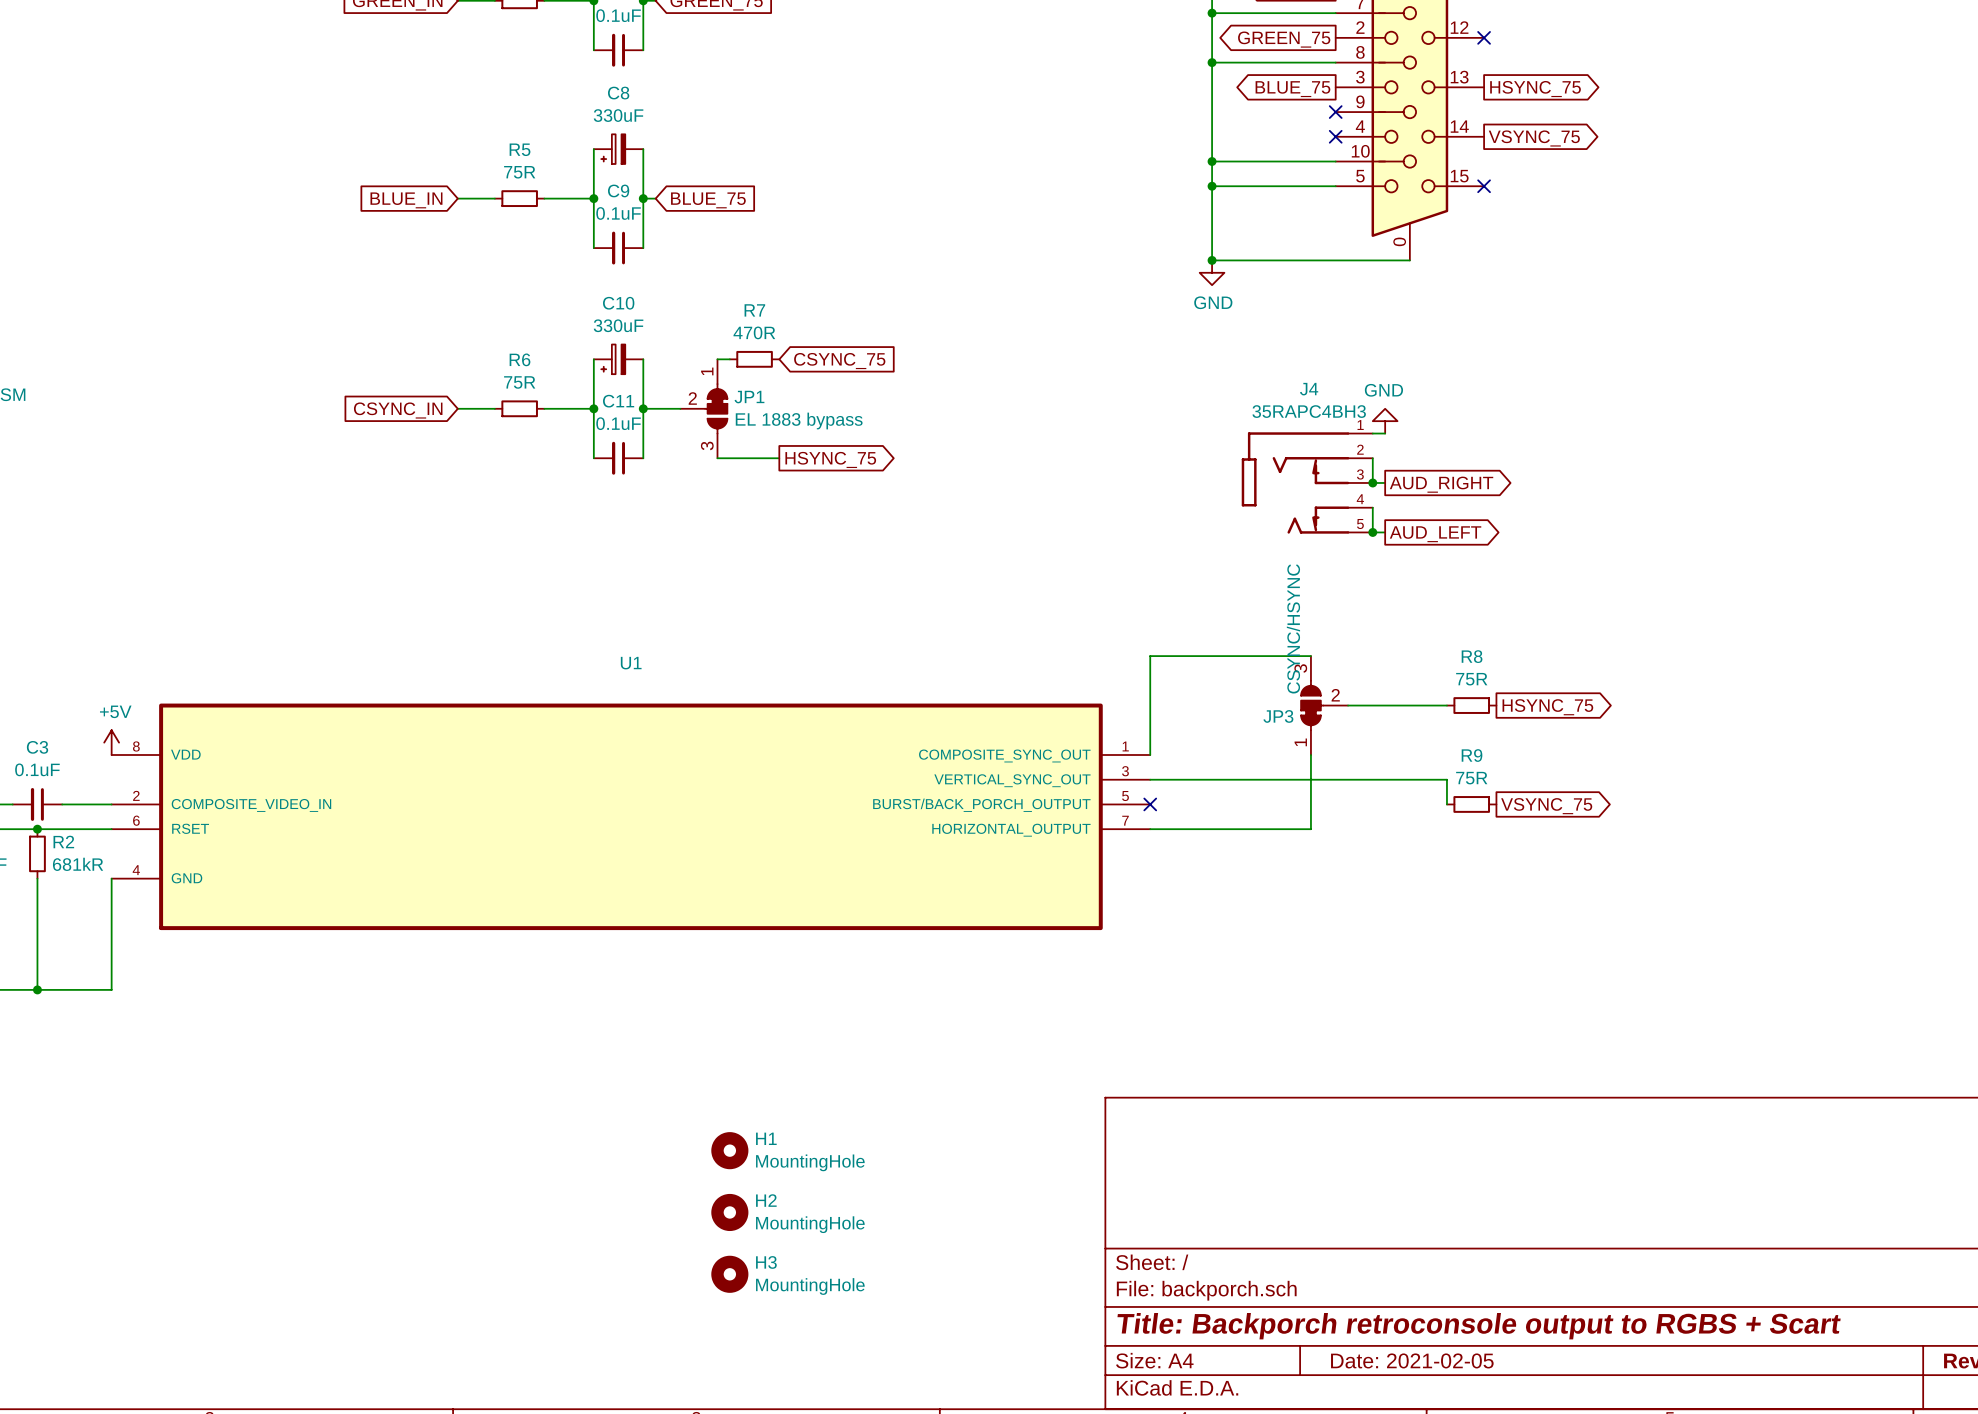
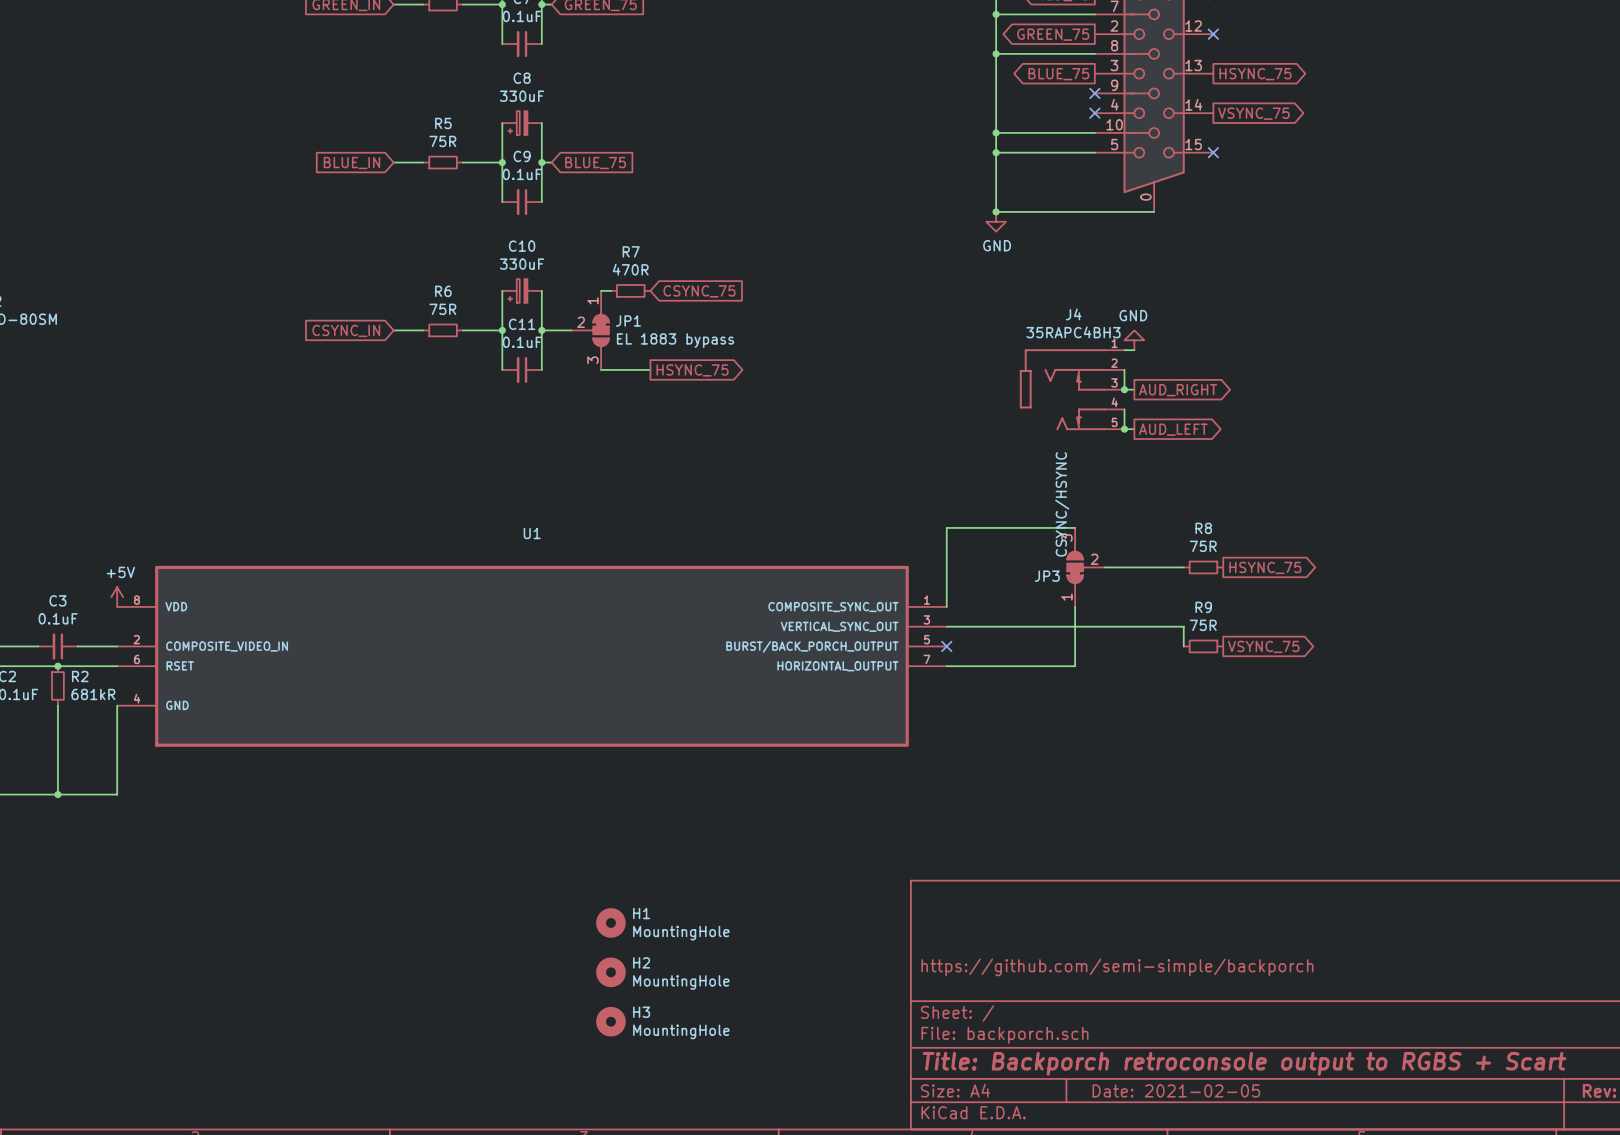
title block: none -> https://github.com/semi-simple/backporch (1117, 967)

